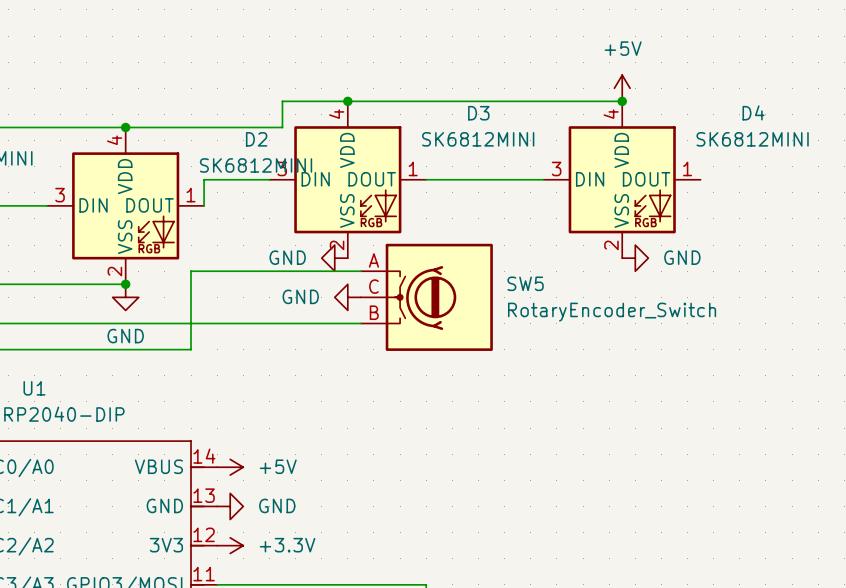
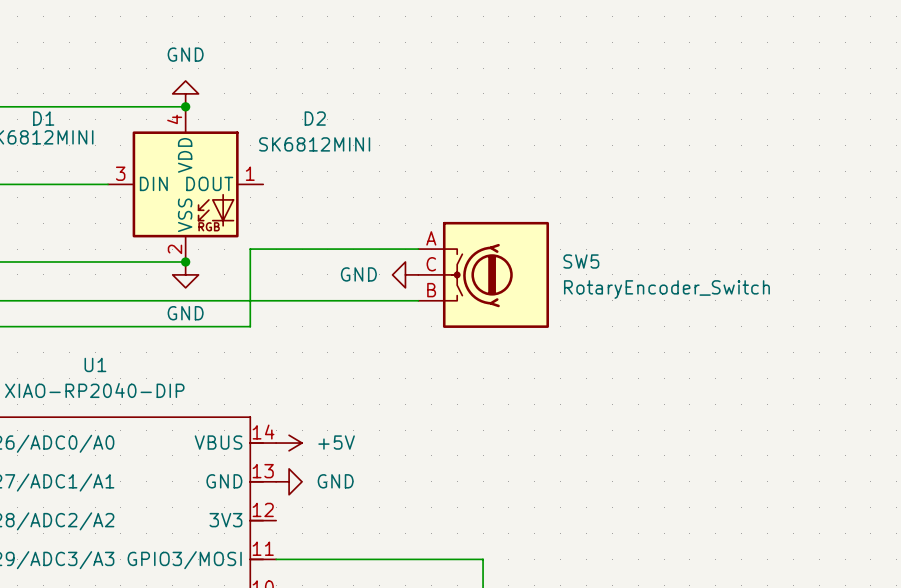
power symbol: +5V (622, 88) -> none
junction: (347, 101) -> none
wire: (622, 101) (282, 101) (282, 127) (125, 127) -> none
junction: (622, 101) -> none
wire: (269, 179) (204, 179) (204, 205) -> none
D3: SK6812MINI (347, 179) -> none
wire: (426, 179) (543, 179) -> none
D4: SK6812MINI (622, 179) -> none
power symbol rotation: 0° (334, 258) -> 90° clockwise (185, 93)
power symbol position: GND (334, 258) -> GND (185, 93)
power symbol: GND (635, 258) -> none
power symbol: +3.3V (230, 545) -> none

